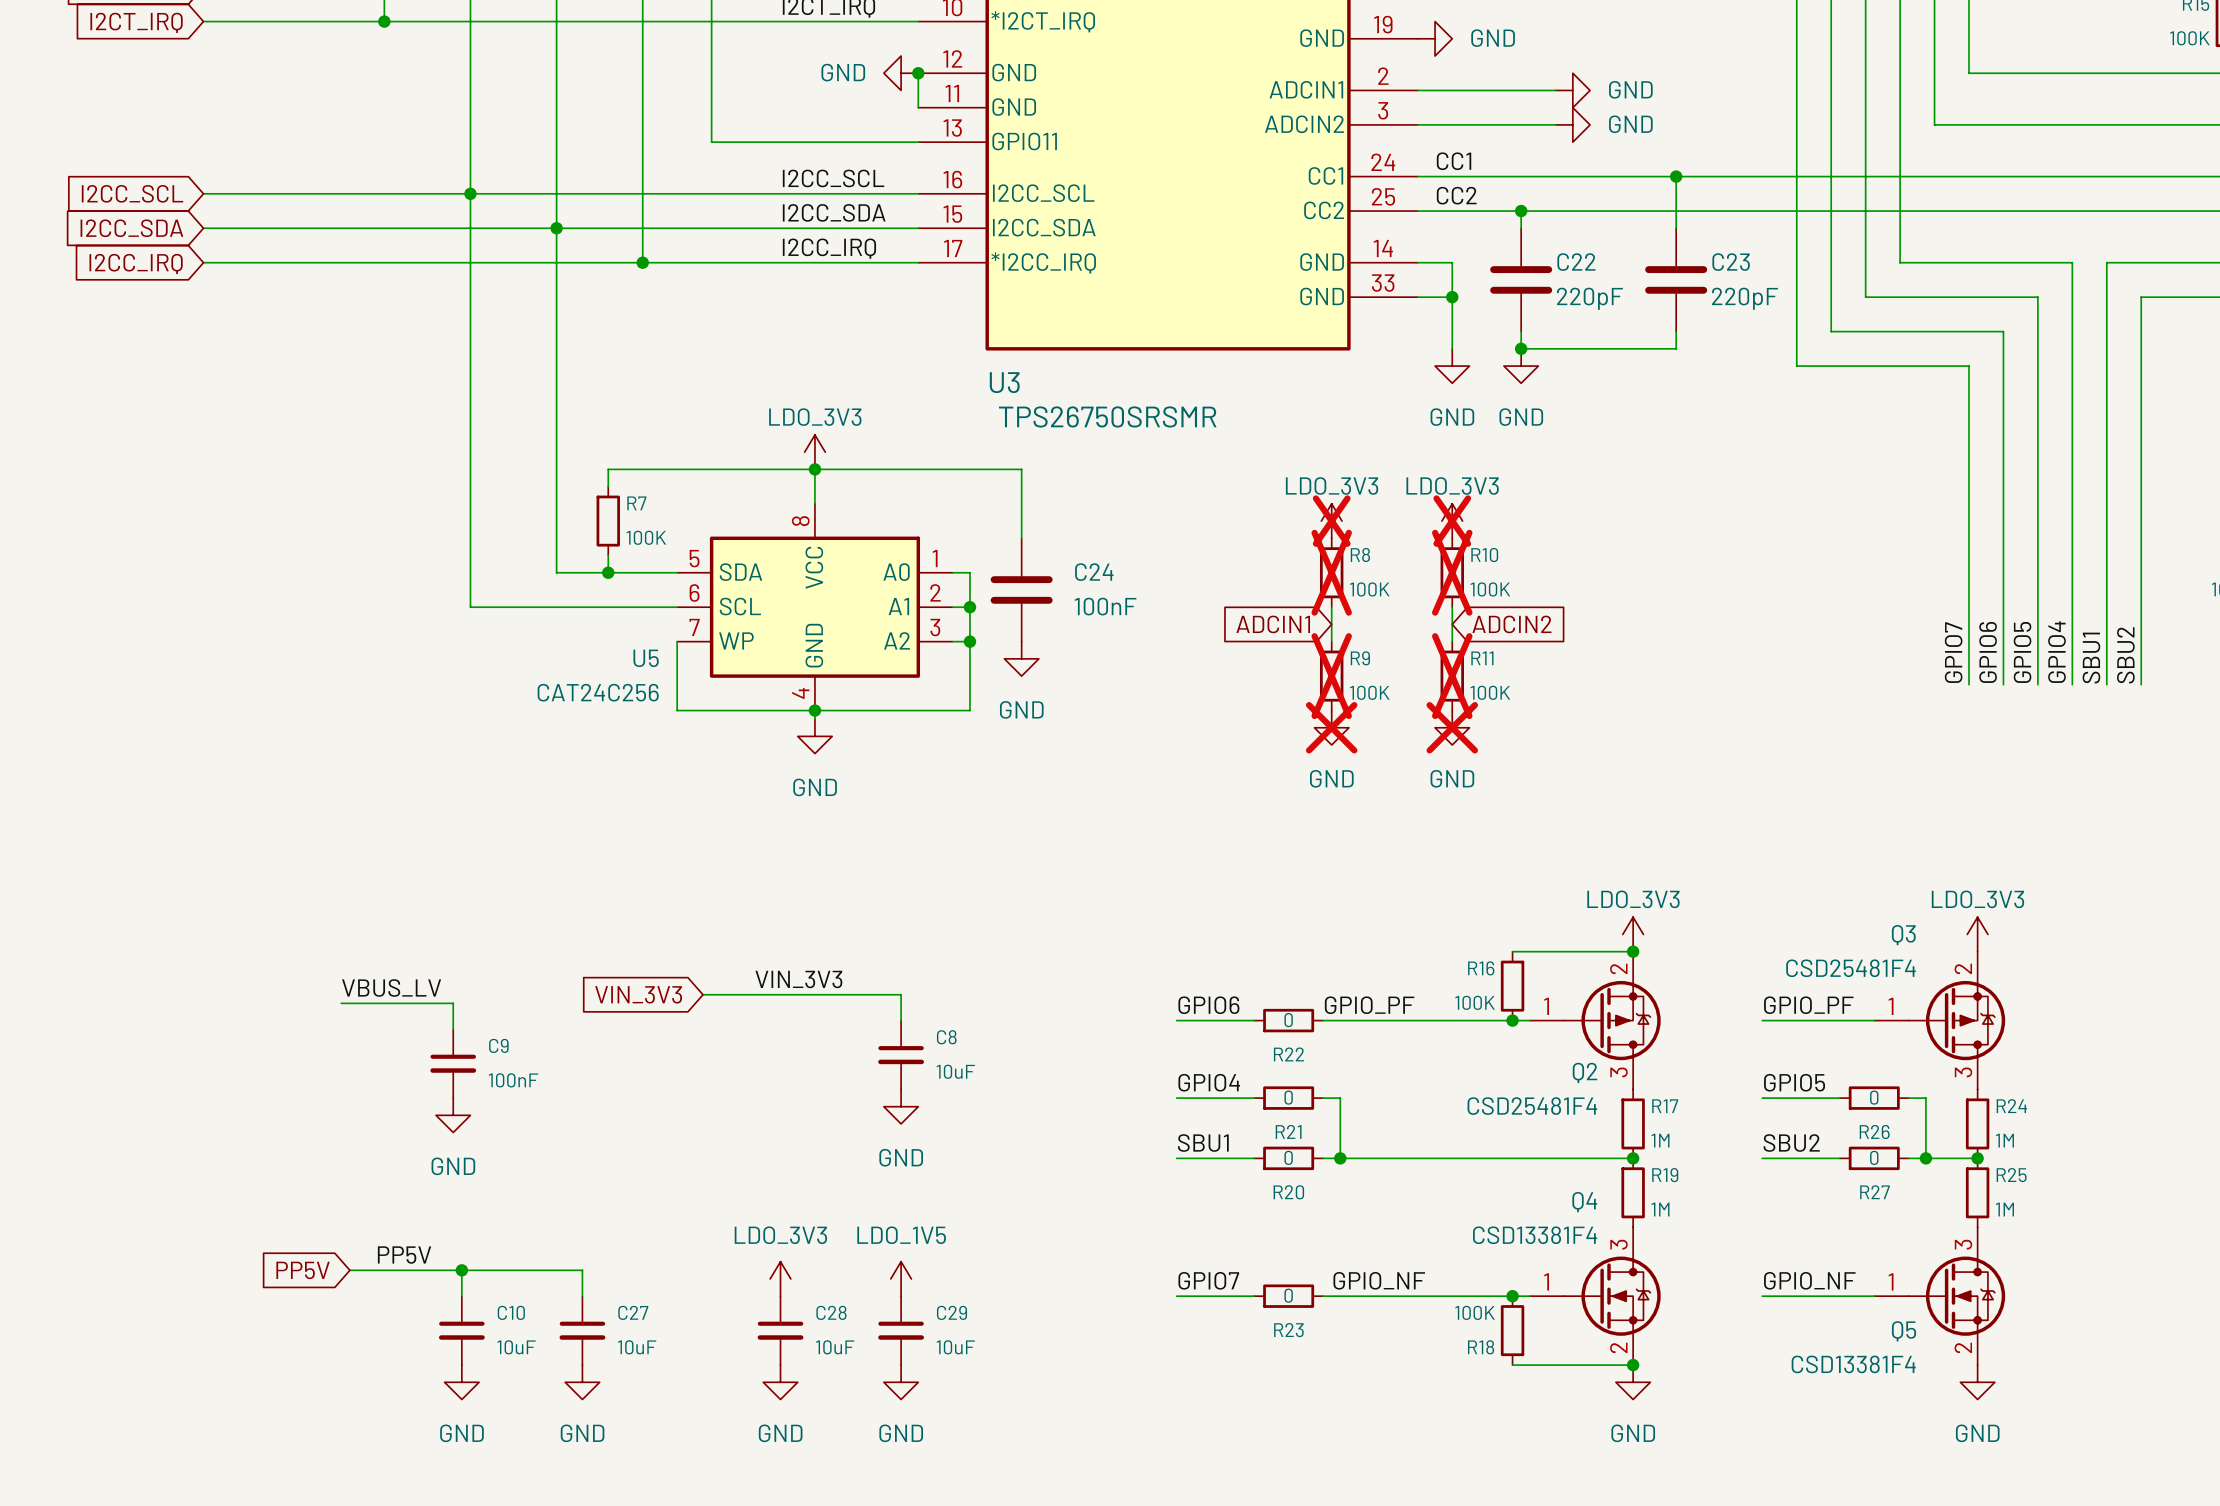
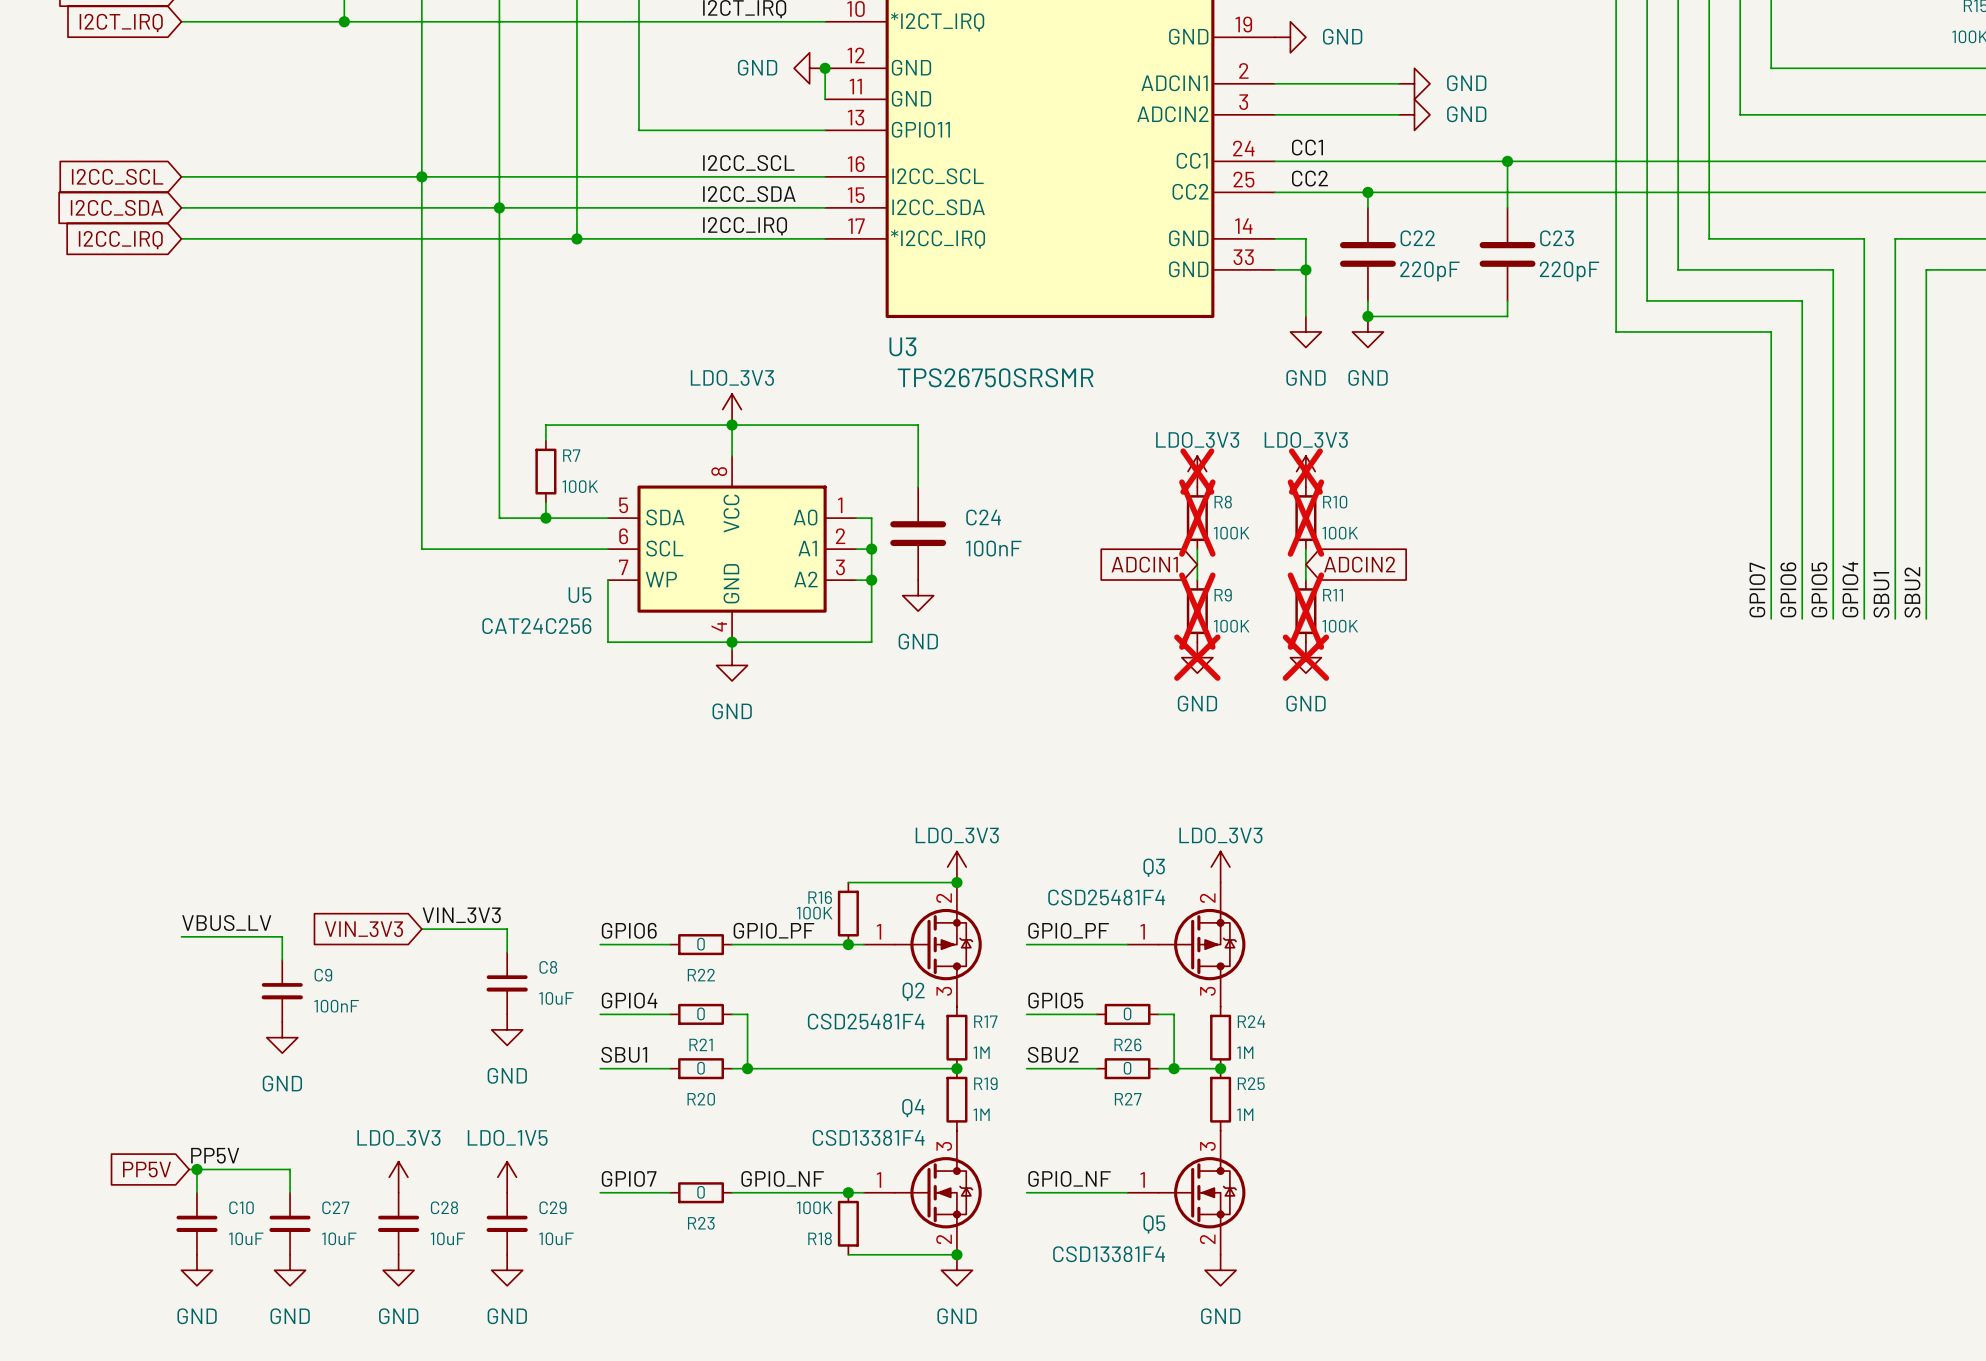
power symbol position: LDO_3V3 (1633, 934) -> LDO_3V3 (1220, 867)
power symbol: LDO_3V3 (1977, 934) -> none
wire: (1512, 951) (1633, 951) -> none
junction: (1633, 951) -> none
power symbol: none -> LDO_3V3 (956, 867)
wire: none -> (848, 882) (956, 882)
junction: none -> (956, 882)
label position: VIN_3V3 (798, 979) -> VIN_3V3 (461, 915)
R16 position: (1512, 986) -> (848, 913)
label position: VBUS_LV (391, 987) -> VBUS_LV (226, 923)
global label position: VIN_3V3 (638, 994) -> VIN_3V3 (363, 929)
wire: (703, 994) (901, 994) (901, 1020) -> none
R16 value position: 100K (1475, 1002) -> 100K (814, 913)
wire: (341, 1003) (453, 1003) (453, 1029) -> (181, 936) (282, 936) (282, 960)
label: GPIO6 (1208, 1005) -> none
label position: GPIO_PF (1369, 1005) -> GPIO_PF (1068, 930)
label: GPIO_PF (1808, 1005) -> none
wire: (1176, 1020) (1254, 1020) -> none
R22 position: (1288, 1020) -> (701, 944)
wire: (1323, 1020) (1529, 1020) -> none
junction: (1512, 1020) -> none
Q2 position: (1595, 1020) -> (922, 944)
wire: (1762, 1020) (1874, 1020) -> none
Q3 position: (1939, 1020) -> (1186, 944)
wire: none -> (421, 929) (507, 929) (507, 952)
label: none -> GPIO6 (629, 930)
label: none -> GPIO_PF (773, 930)
wire: none -> (600, 944) (670, 944)
wire: none -> (732, 944) (863, 944)
junction: none -> (848, 944)
wire: none -> (1026, 944) (1127, 944)
C8 position: (901, 1055) -> (507, 983)
C9 position: (453, 1063) -> (282, 991)
label: GPIO4 (1209, 1082) -> GPIO5 (1055, 1000)
label: GPIO5 (1794, 1082) -> none
wire: (1176, 1098) (1254, 1098) -> (1026, 1014) (1096, 1014)
R21 position: (1288, 1098) -> (701, 1014)
wire: (1323, 1098) (1340, 1098) (1340, 1158) -> (1158, 1014) (1174, 1014) (1174, 1068)
wire: (1762, 1098) (1839, 1098) -> none
R26 position: (1874, 1098) -> (1127, 1014)
wire: (1908, 1098) (1925, 1098) (1925, 1158) -> none
power symbol: GND (901, 1106) -> none
label: none -> GPIO4 (629, 1000)
power symbol: GND (453, 1115) -> none
wire: none -> (600, 1014) (670, 1014)
wire: none -> (732, 1014) (747, 1014) (747, 1068)
R17 position: (1633, 1123) -> (956, 1037)
R24 position: (1977, 1123) -> (1220, 1037)
power symbol: none -> GND (507, 1029)
label: SBU1 (1203, 1143) -> SBU2 (1053, 1054)
label: SBU2 (1791, 1143) -> none
power symbol: none -> GND (282, 1037)
wire: (1176, 1158) (1254, 1158) -> (1026, 1068) (1096, 1068)
R20 position: (1288, 1158) -> (701, 1068)
wire: (1323, 1158) (1633, 1158) -> none
junction: (1340, 1158) -> none
junction: (1633, 1158) -> none
wire: (1762, 1158) (1839, 1158) -> none
R27 position: (1874, 1158) -> (1127, 1068)
wire: (1908, 1158) (1977, 1158) -> none
junction: (1925, 1158) -> none
junction: (1977, 1158) -> none
label: none -> SBU1 (624, 1054)
wire: none -> (600, 1068) (670, 1068)
wire: none -> (732, 1068) (956, 1068)
junction: none -> (747, 1068)
junction: none -> (956, 1068)
wire: none -> (1158, 1068) (1220, 1068)
junction: none -> (1174, 1068)
junction: none -> (1220, 1068)
R19 position: (1633, 1192) -> (956, 1099)
R25 position: (1977, 1192) -> (1220, 1099)
label position: PP5V (404, 1255) -> PP5V (215, 1155)
global label position: PP5V (303, 1270) -> PP5V (147, 1169)
wire: (349, 1270) (582, 1270) (582, 1296) -> none
wire: (461, 1270) (461, 1296) -> (196, 1169) (196, 1192)
junction: (461, 1270) -> none
power symbol: LDO_3V3 (780, 1278) -> none
power symbol position: LDO_1V5 (901, 1278) -> LDO_1V5 (507, 1177)
label: GPIO7 (1208, 1280) -> none
label position: GPIO_NF (1379, 1280) -> GPIO_NF (1069, 1178)
label: GPIO_NF (1809, 1280) -> none
wire: none -> (189, 1169) (290, 1169) (290, 1192)
junction: none -> (196, 1169)
wire: (1176, 1296) (1254, 1296) -> none
R23 position: (1288, 1296) -> (701, 1192)
wire: (1323, 1296) (1529, 1296) -> none
junction: (1512, 1296) -> none
Q4 position: (1595, 1296) -> (922, 1192)
wire: (1762, 1296) (1874, 1296) -> none
Q5 position: (1939, 1296) -> (1186, 1192)
power symbol: none -> LDO_3V3 (398, 1177)
label: none -> GPIO7 (629, 1178)
label: none -> GPIO_NF (782, 1178)
wire: none -> (600, 1192) (670, 1192)
wire: none -> (732, 1192) (863, 1192)
junction: none -> (848, 1192)
wire: none -> (1026, 1192) (1127, 1192)
C10 position: (461, 1330) -> (196, 1223)
C27 position: (582, 1330) -> (290, 1223)
C28 position: (780, 1330) -> (398, 1223)
C29 position: (901, 1330) -> (507, 1223)
R18 position: (1512, 1330) -> (848, 1223)
wire: (1512, 1365) (1633, 1365) -> none
junction: (1633, 1365) -> none
power symbol position: GND (461, 1382) -> GND (398, 1270)
power symbol position: GND (582, 1382) -> GND (507, 1270)
power symbol: GND (780, 1382) -> none
power symbol: GND (901, 1382) -> none
power symbol: GND (1633, 1382) -> none
power symbol: GND (1977, 1382) -> none
wire: none -> (848, 1254) (956, 1254)
junction: none -> (956, 1254)
power symbol: none -> GND (196, 1270)
power symbol: none -> GND (290, 1270)
power symbol: none -> GND (956, 1270)
power symbol: none -> GND (1220, 1270)

